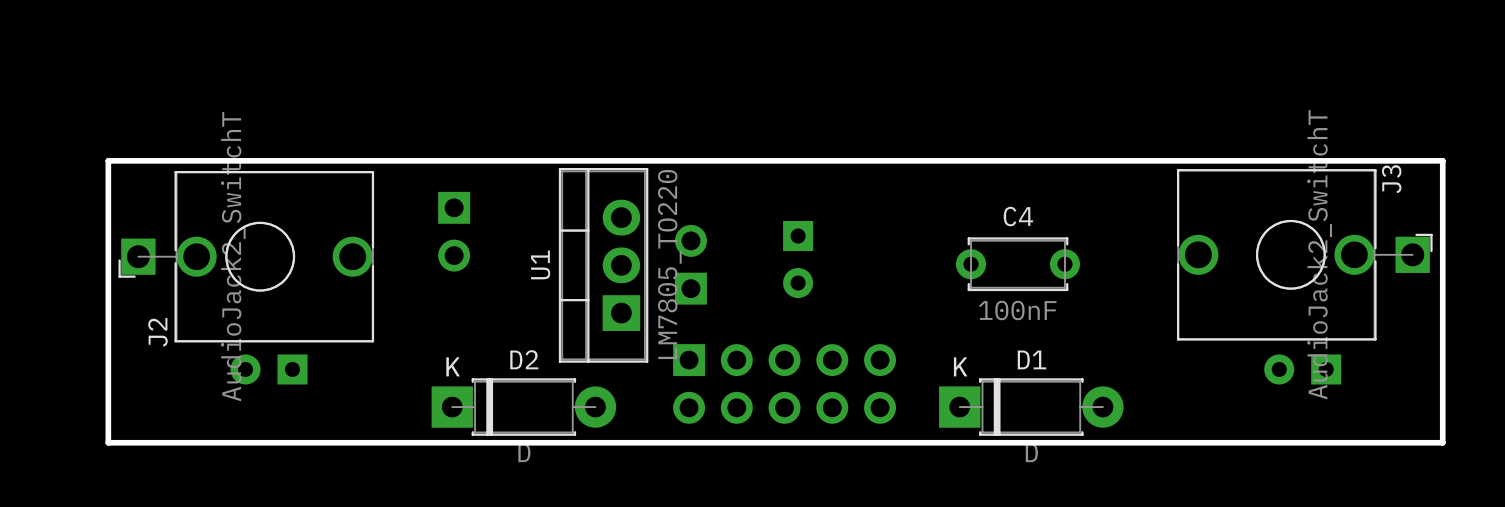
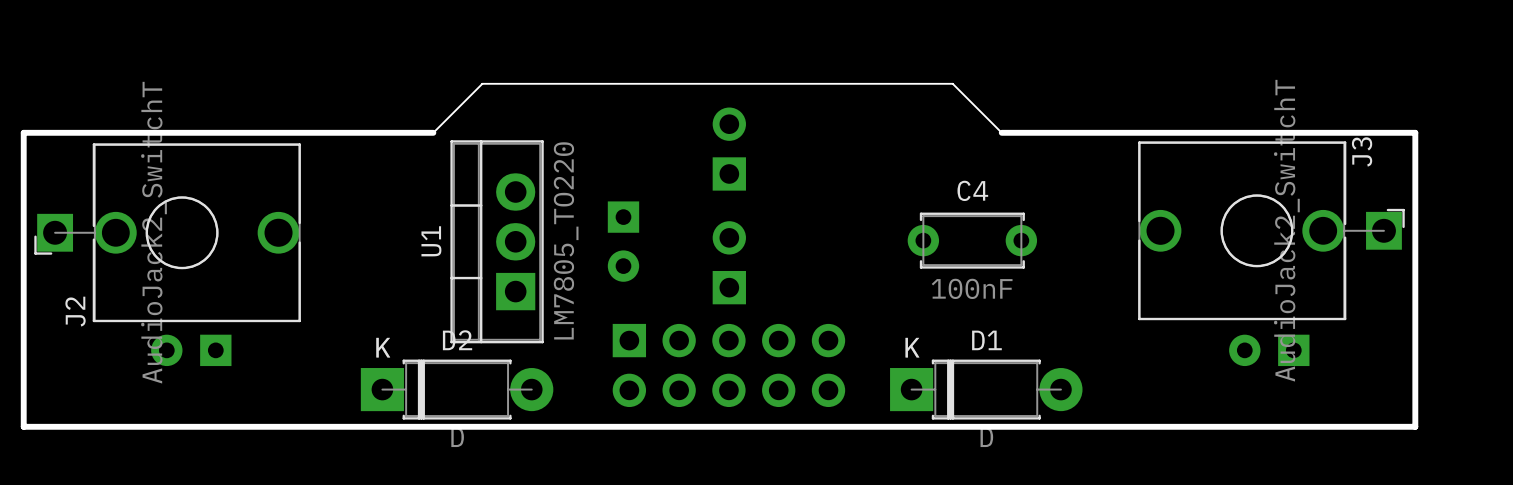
board edge: (501, 160) (1046, 160) -> (433, 132) (482, 83) (952, 83) (1001, 132)
part: none -> (729, 149)
part footprint: [674, 224, 707, 305] -> [607, 201, 640, 282]
part: (454, 231) -> none
part: (798, 259) -> none
U1 position: (603, 265) -> (497, 241)
part: none -> (729, 262)

